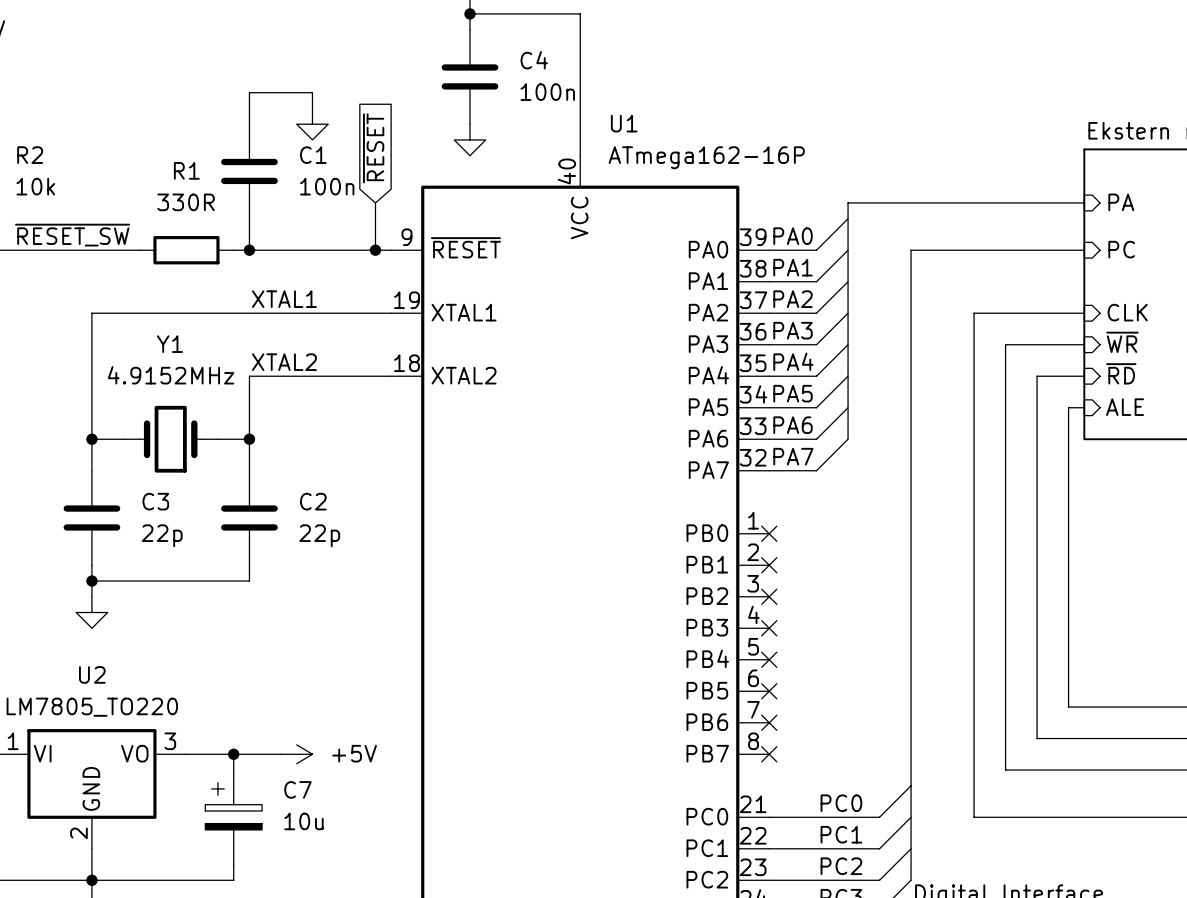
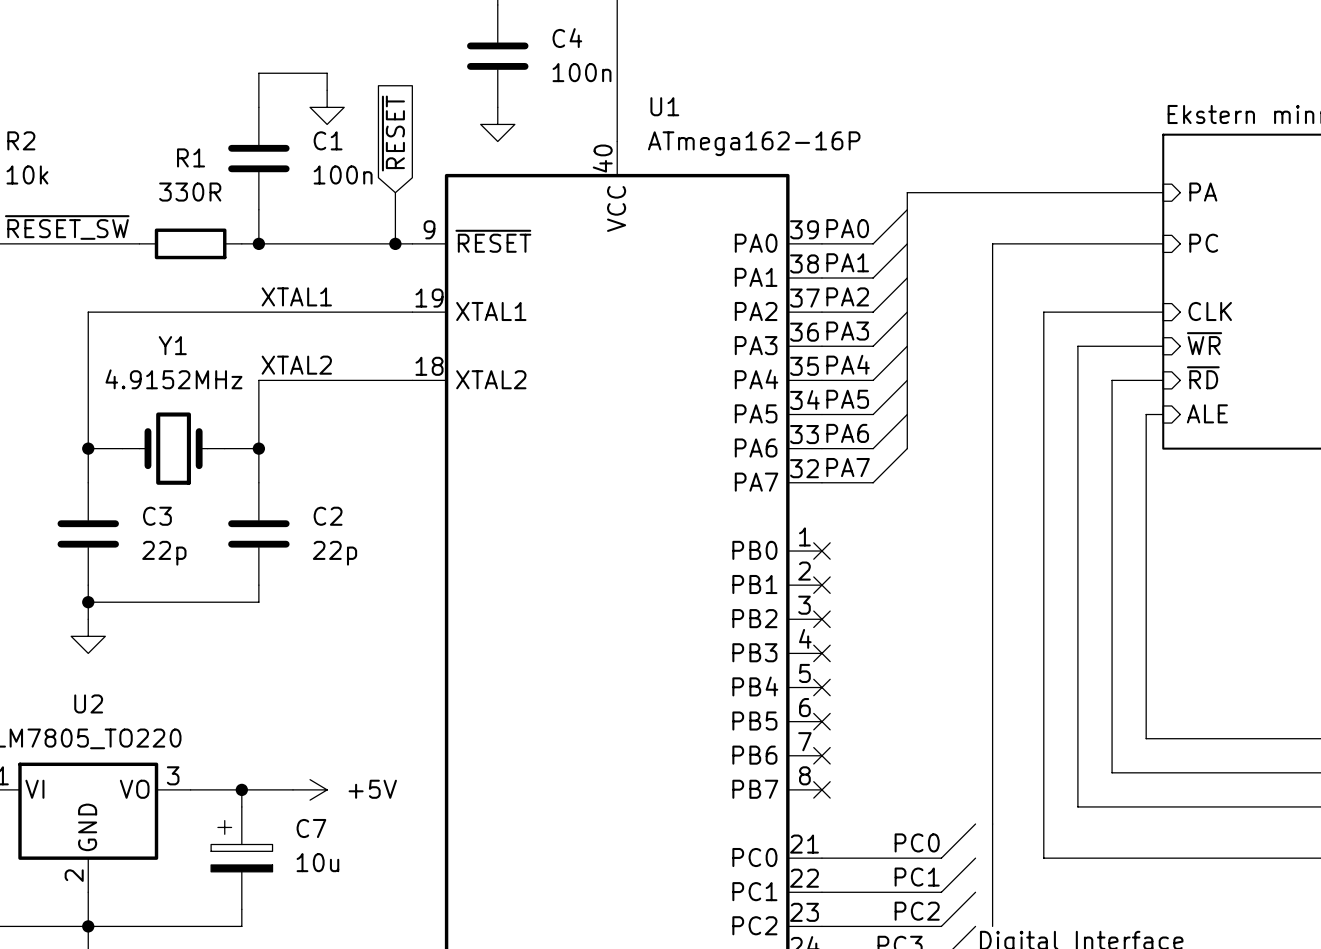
bus: (926, 250) (911, 250) (911, 880) -> (992, 243) (992, 926)
label position: PC0 (841, 803) -> PC0 (917, 842)
label position: PC1 (841, 834) -> PC1 (917, 877)
label position: PC2 (841, 866) -> PC2 (917, 911)

